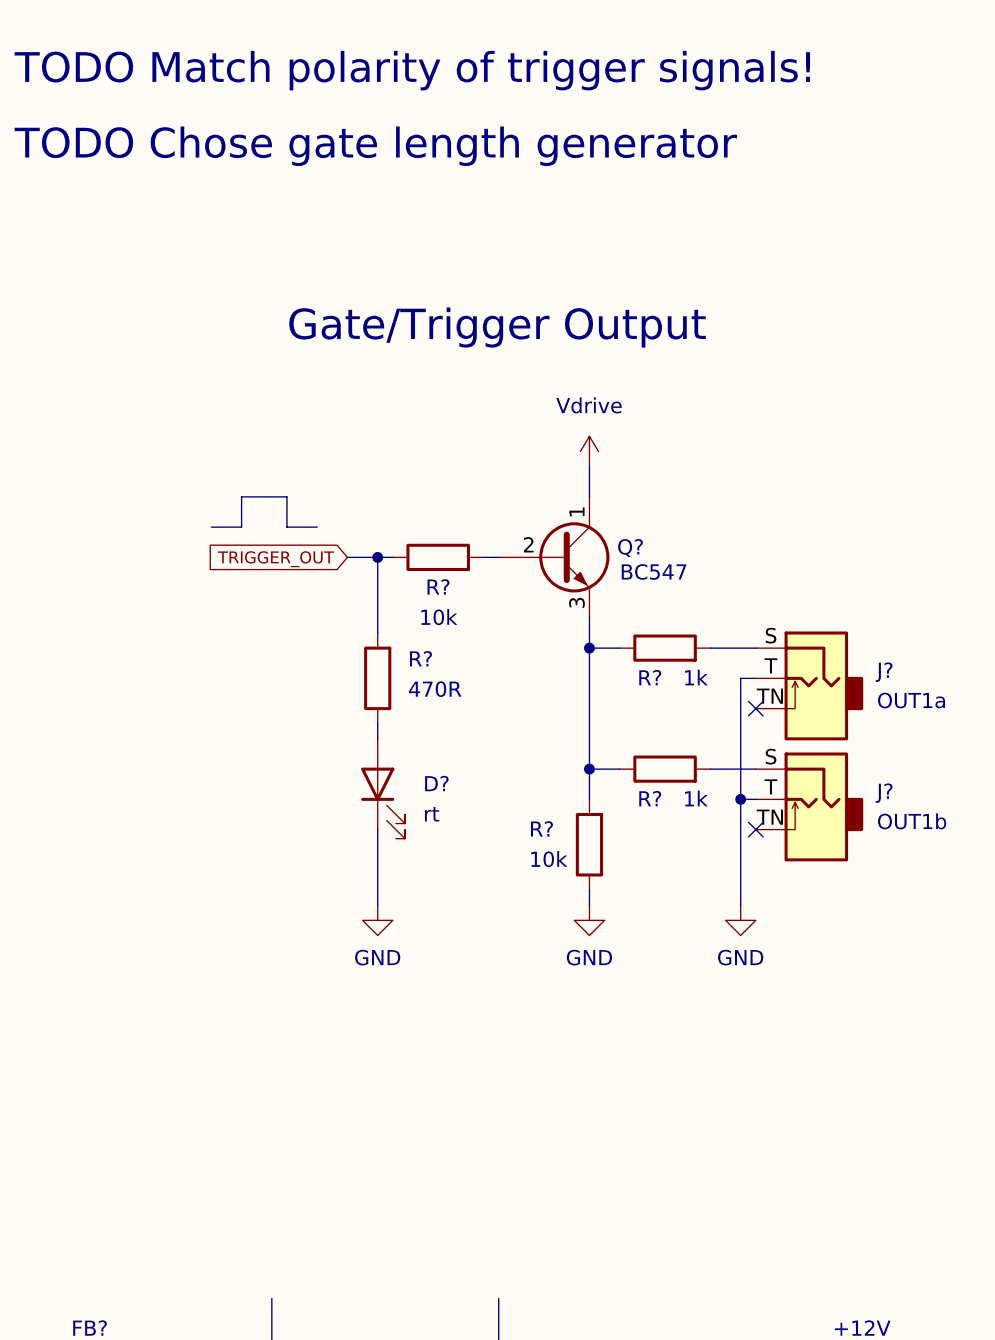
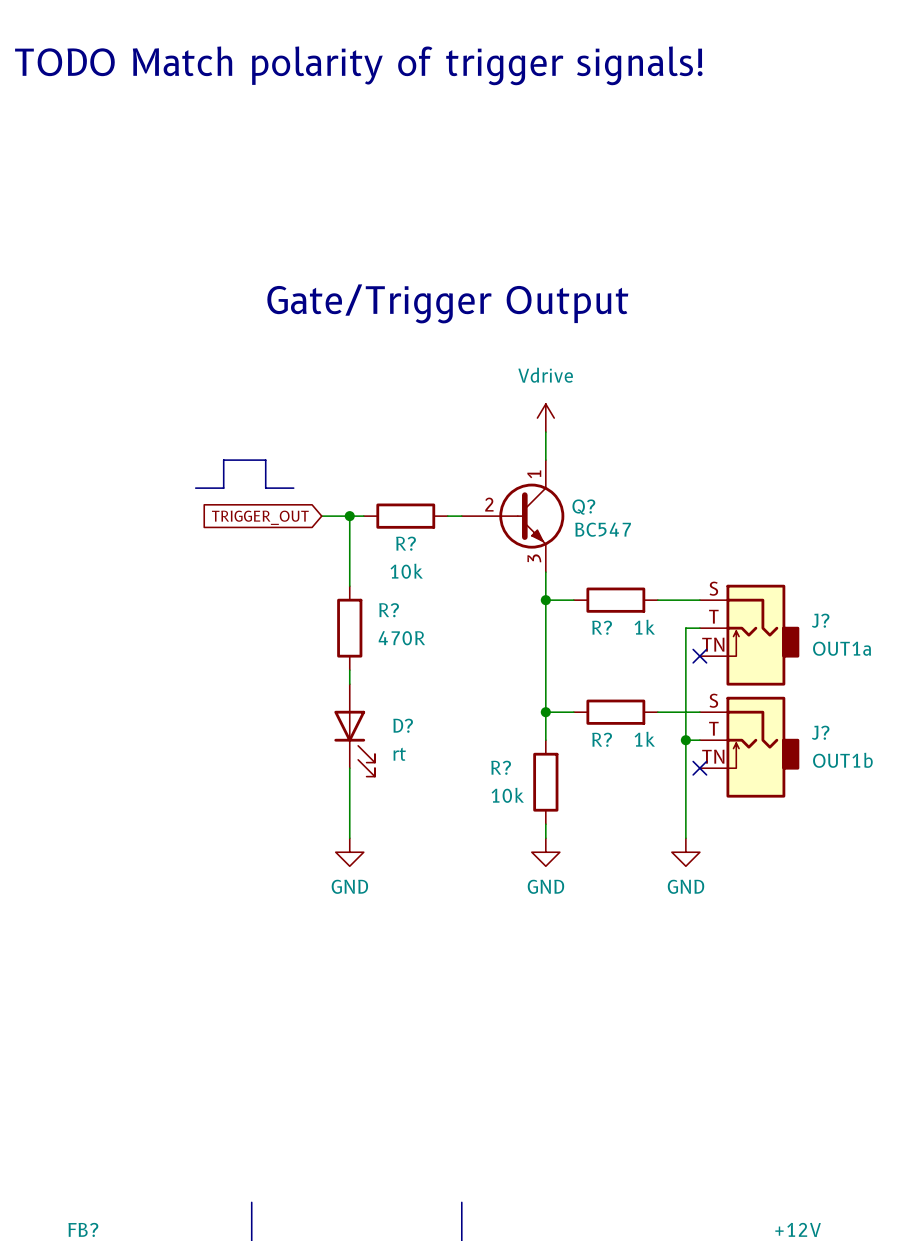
text: TODO Chose gate length generator (375, 146) -> none

